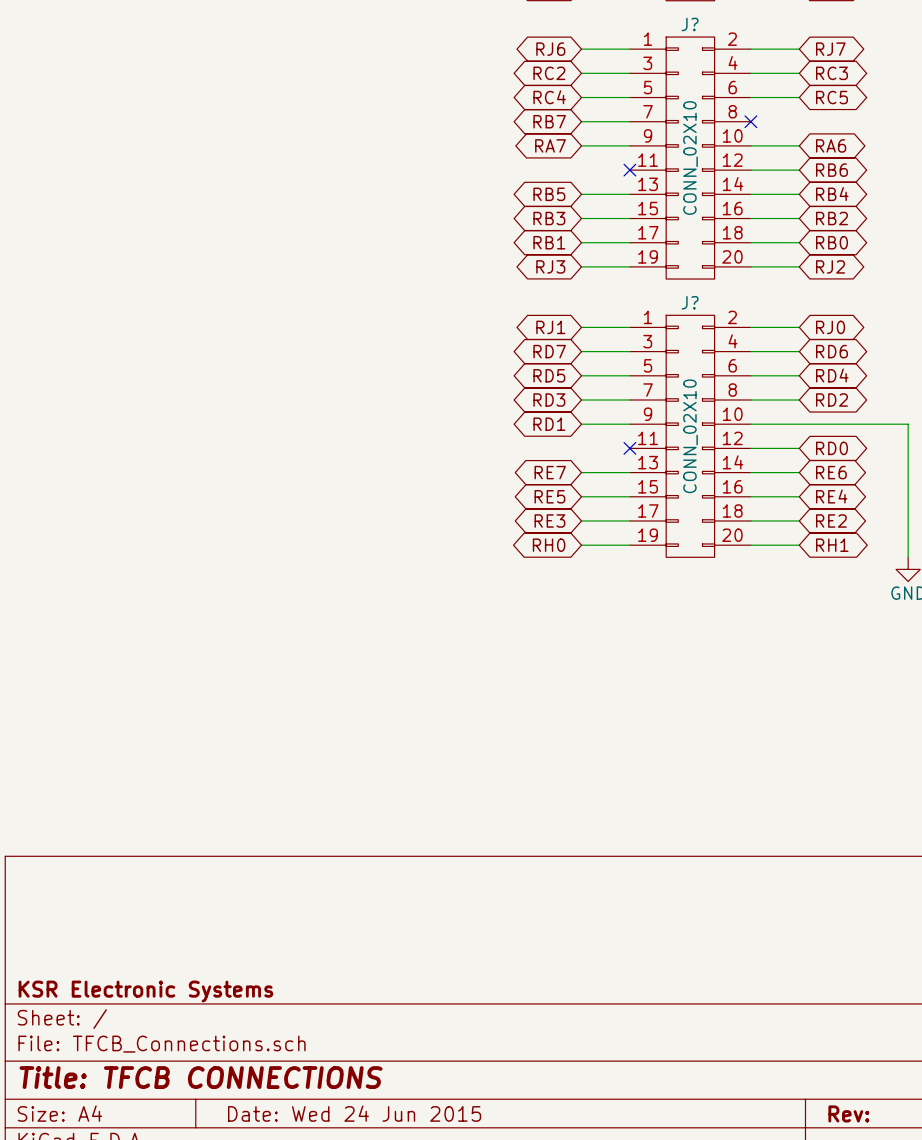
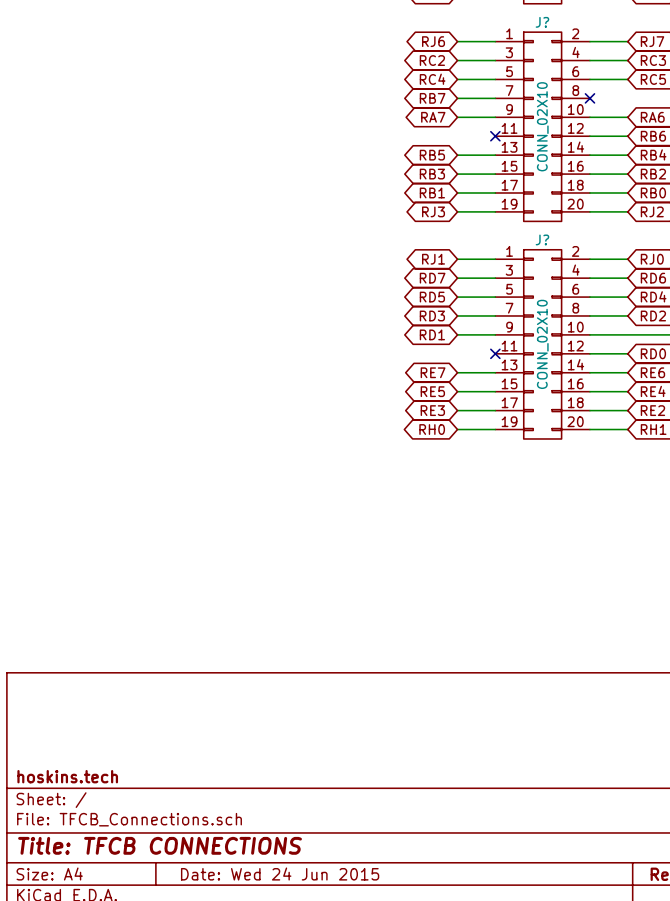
title block: KSR Electronic Systems (145, 991) -> hoskins.tech (67, 776)

